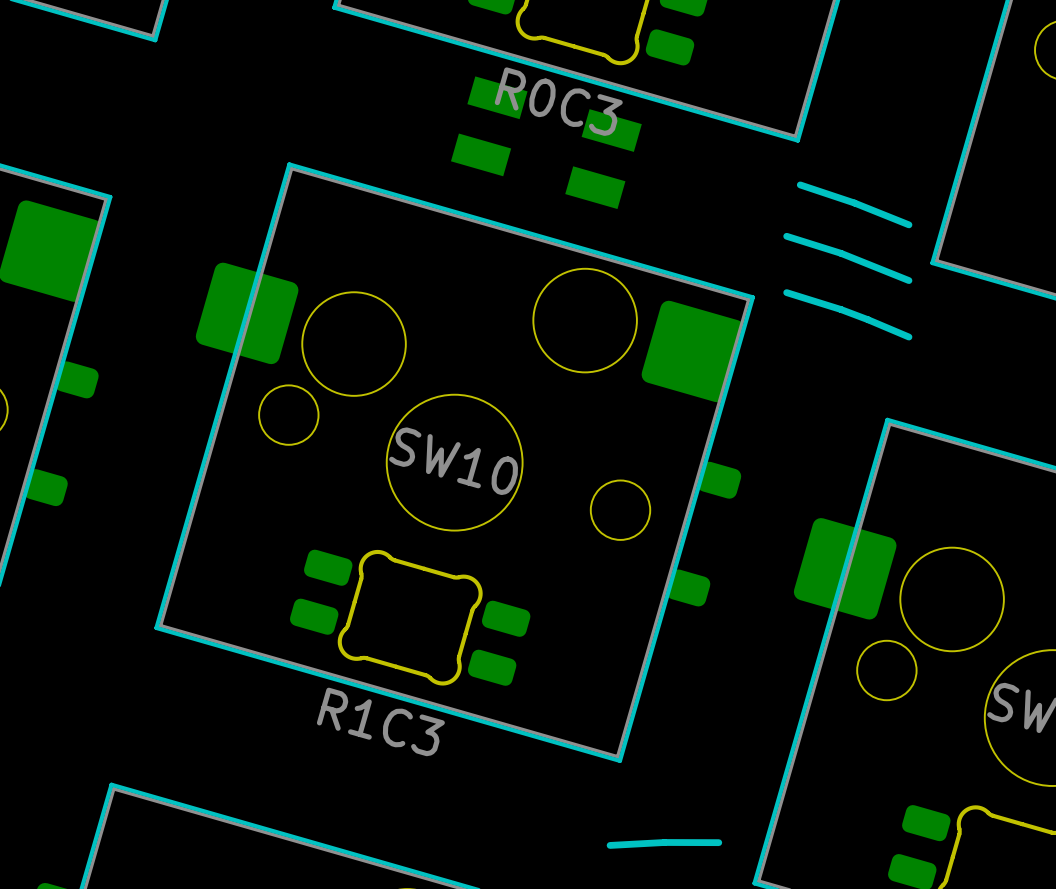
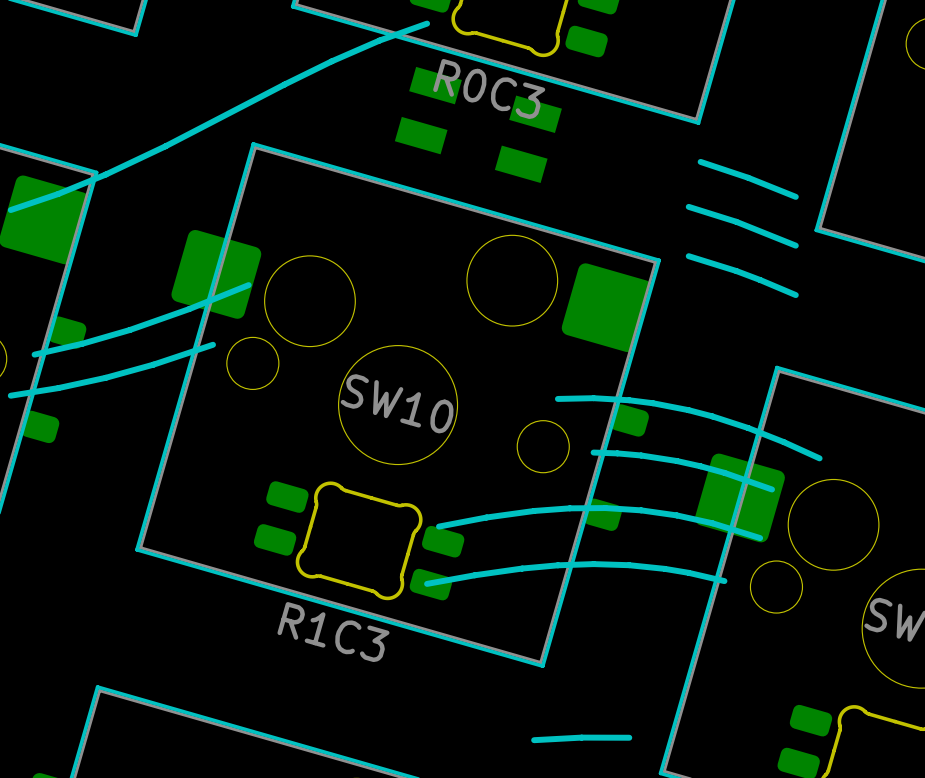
line: none -> (427, 23) (379, 40) (331, 61) (105, 174) (58, 193) (10, 210)
line: none -> (248, 285) (129, 330) (34, 354)
line: none -> (213, 344) (105, 377) (10, 395)
line: none -> (557, 398) (629, 400) (688, 410) (748, 428) (819, 458)
line: none -> (593, 452) (641, 455) (676, 461) (724, 472) (772, 489)
line: none -> (438, 526) (534, 510) (605, 508) (676, 515) (712, 523) (760, 538)
line: none -> (724, 581) (664, 568) (593, 564) (522, 568) (427, 583)

